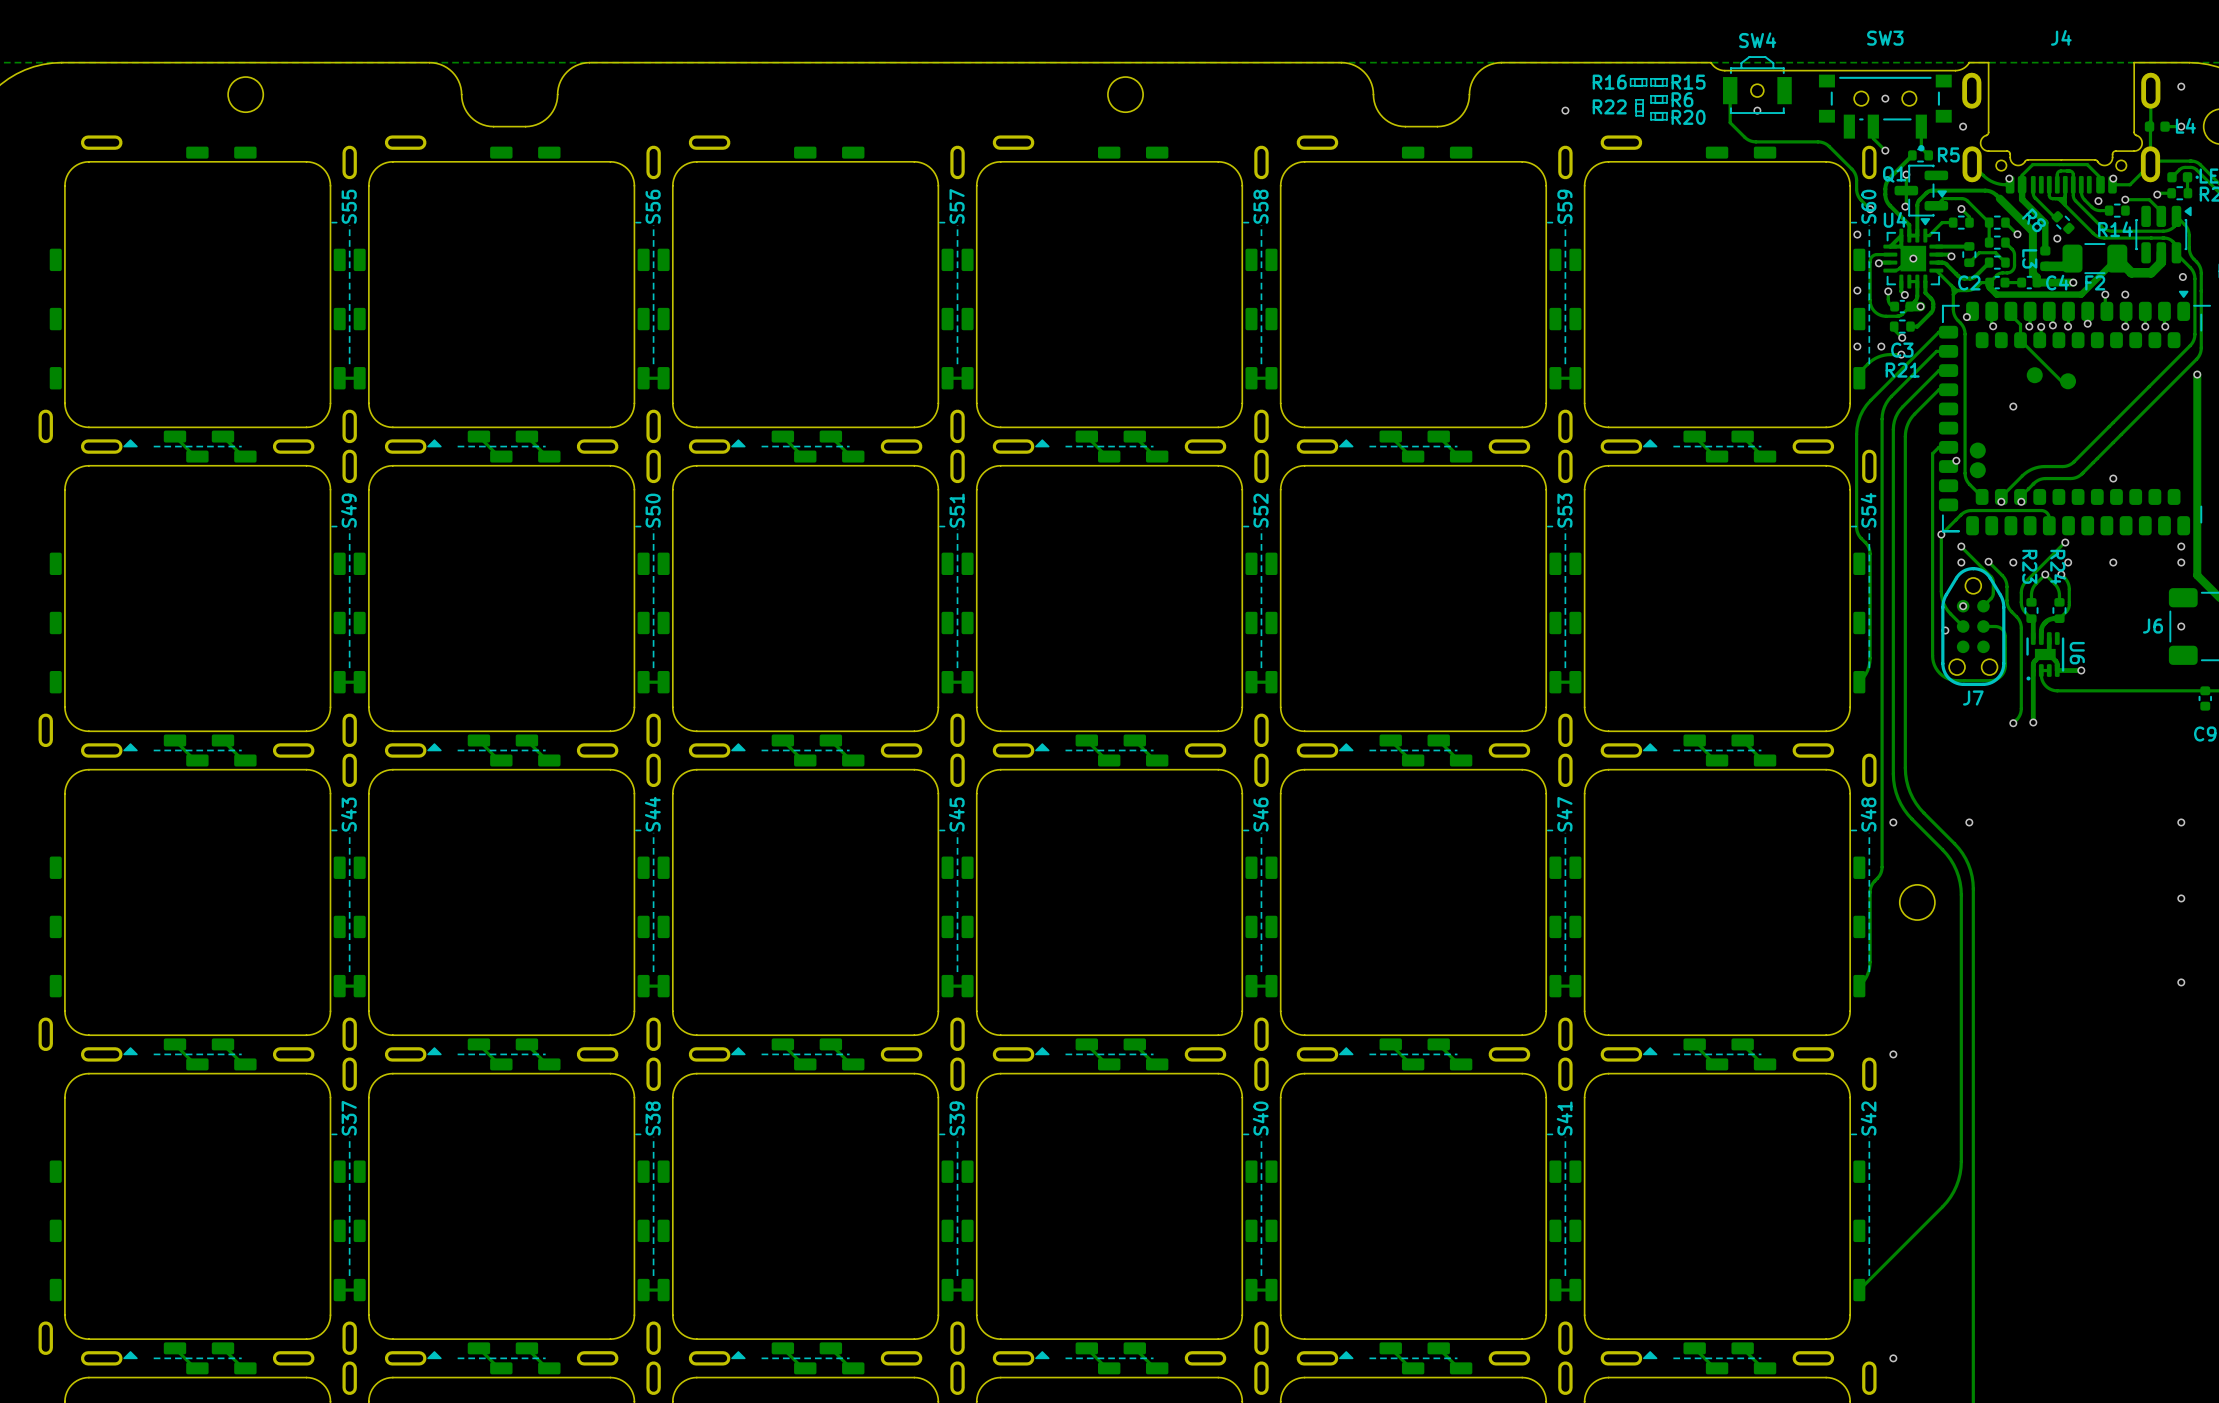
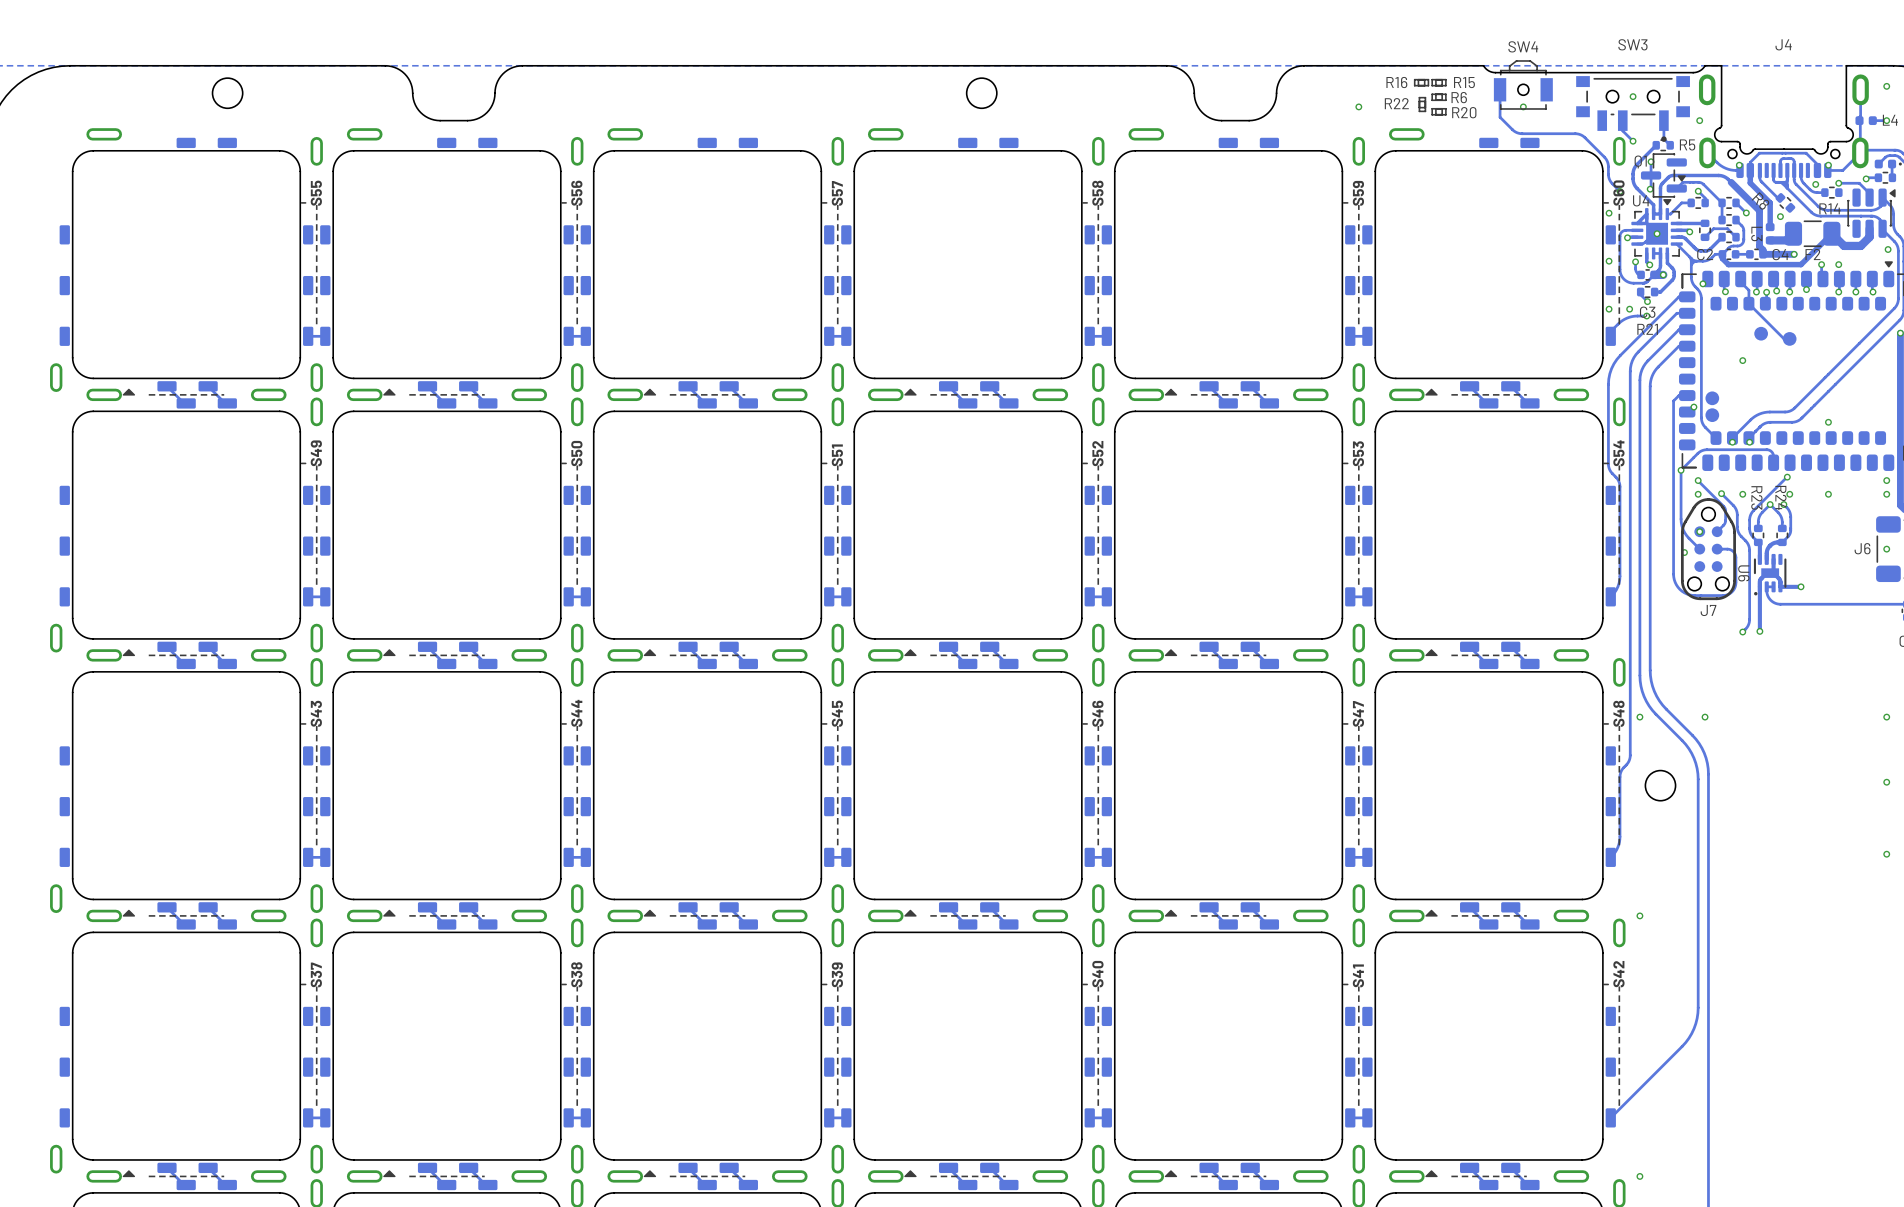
U6 name position: U6 (2077, 653) -> U6 (1743, 573)

